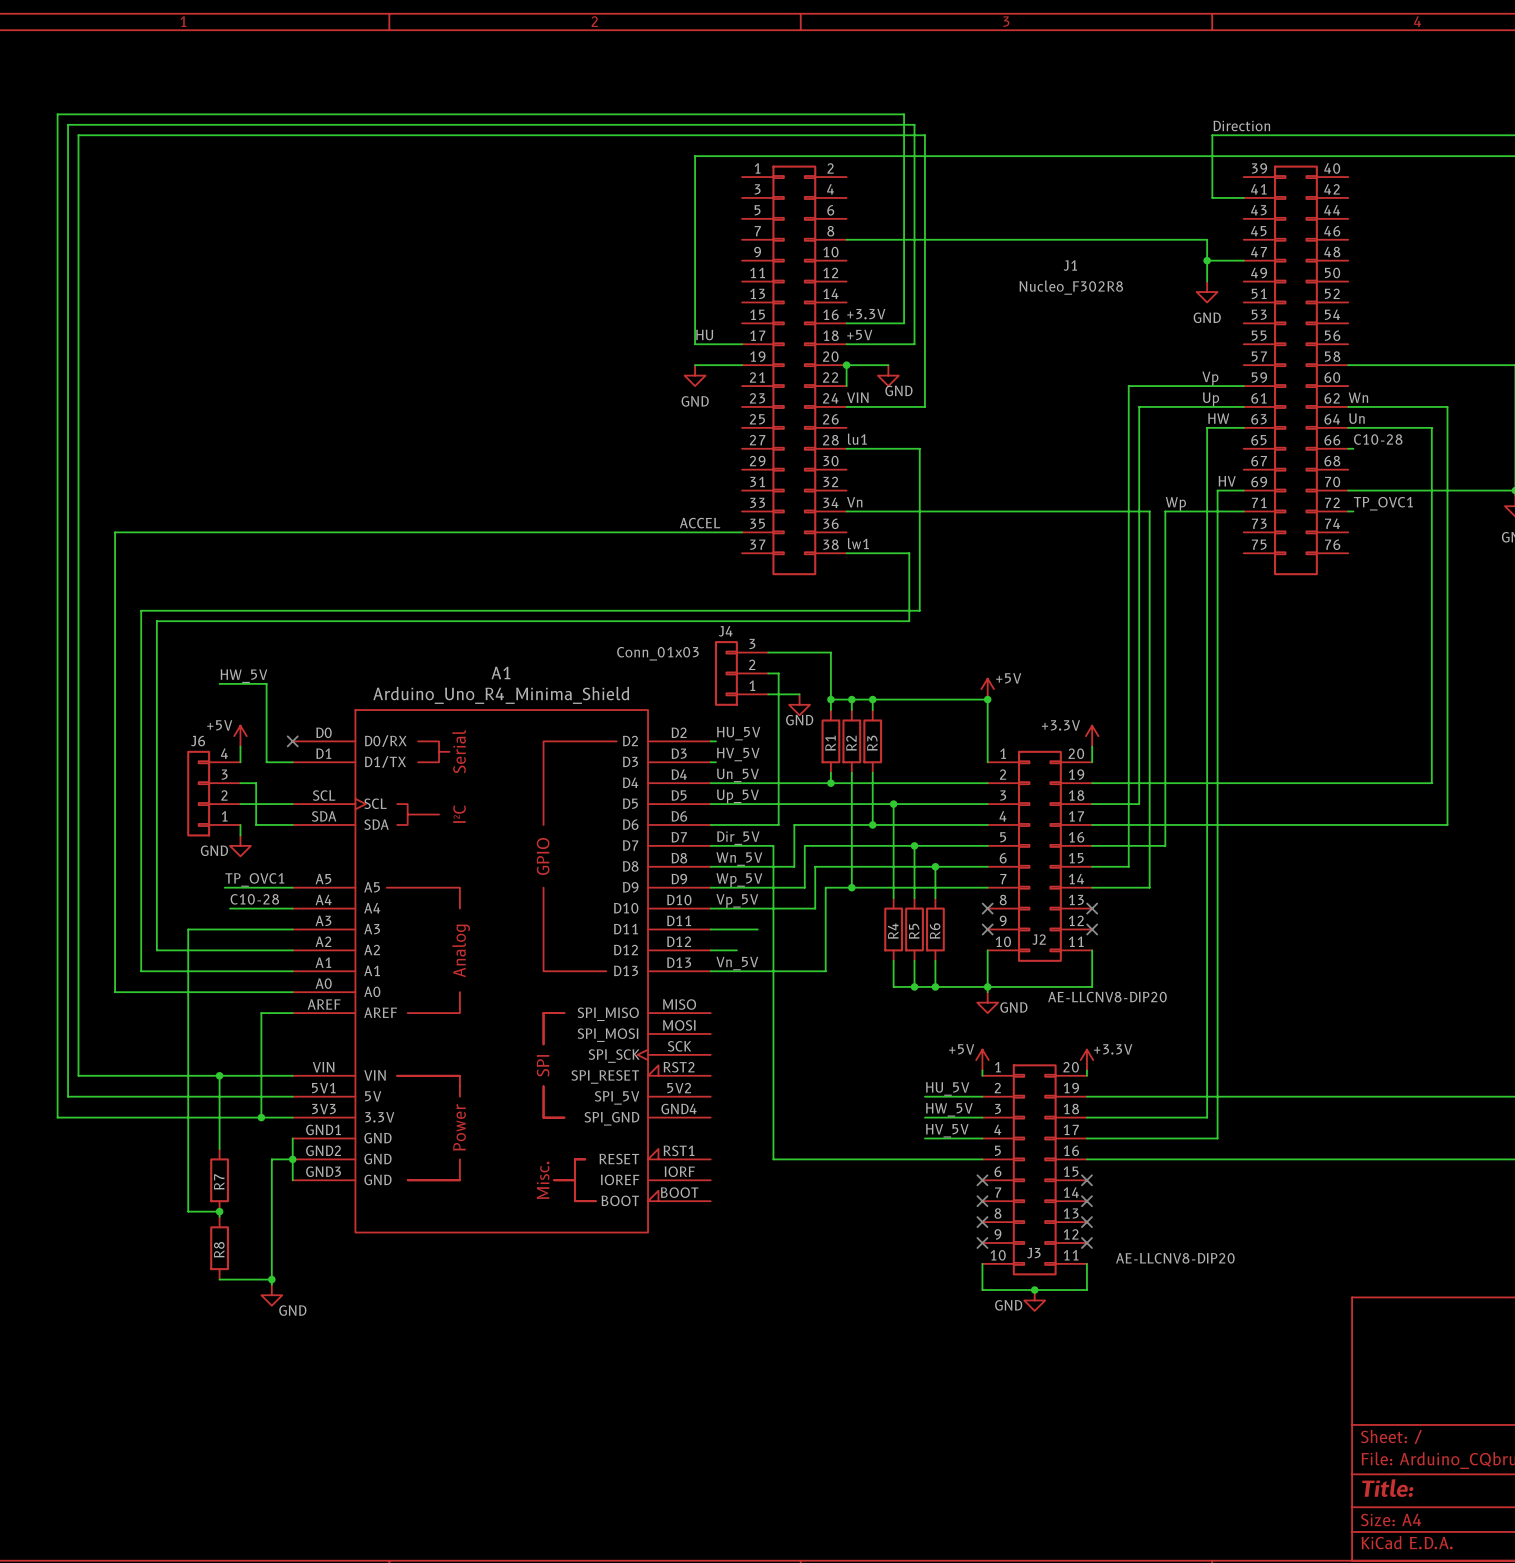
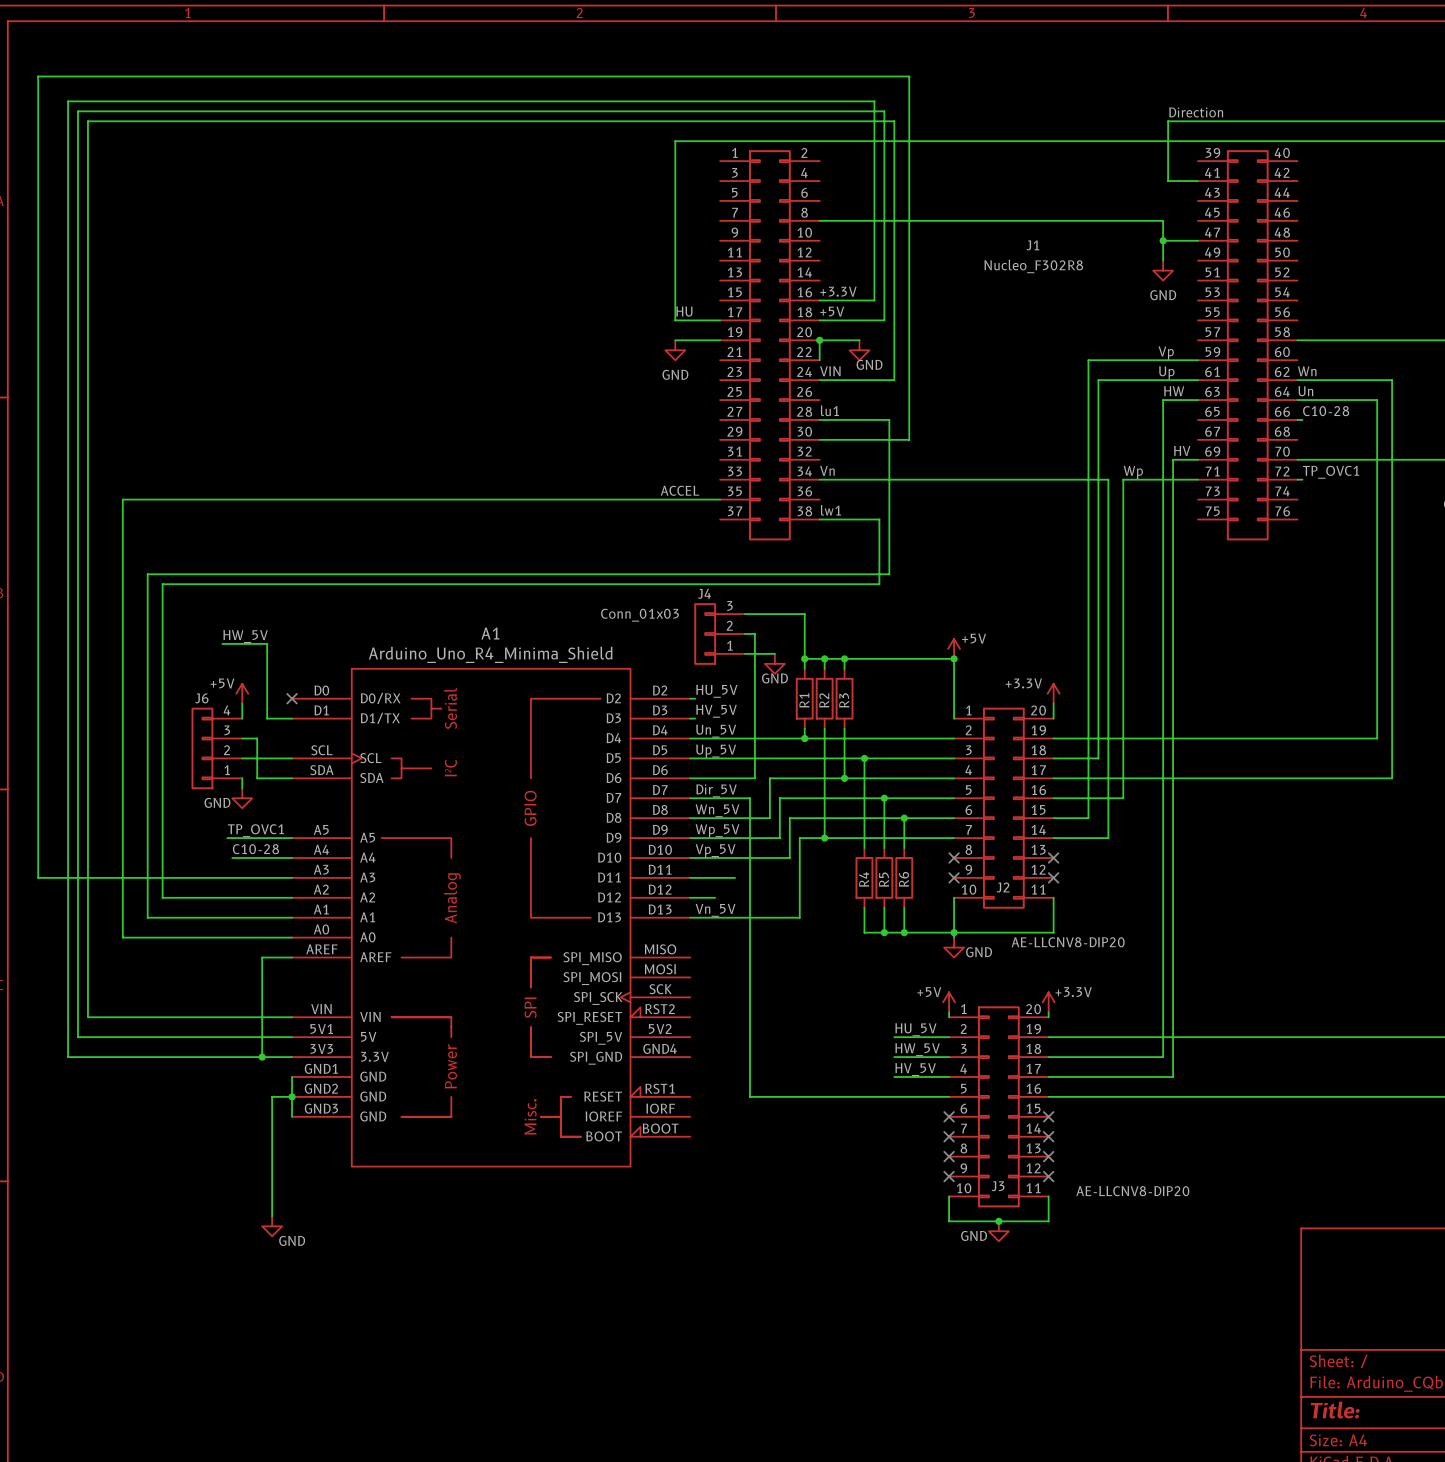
wire: (188, 929) (188, 1211) (219, 1211) (219, 1216) -> (192, 877) (38, 877) (38, 76) (909, 76) (909, 439) (819, 439)
wire: (219, 1075) (219, 1148) -> none
junction: (219, 1075) -> none
R7: (219, 1180) -> none
junction: (219, 1211) -> none
R8: (219, 1248) -> none
wire: (219, 1279) (271, 1279) -> none
junction: (271, 1279) -> none

